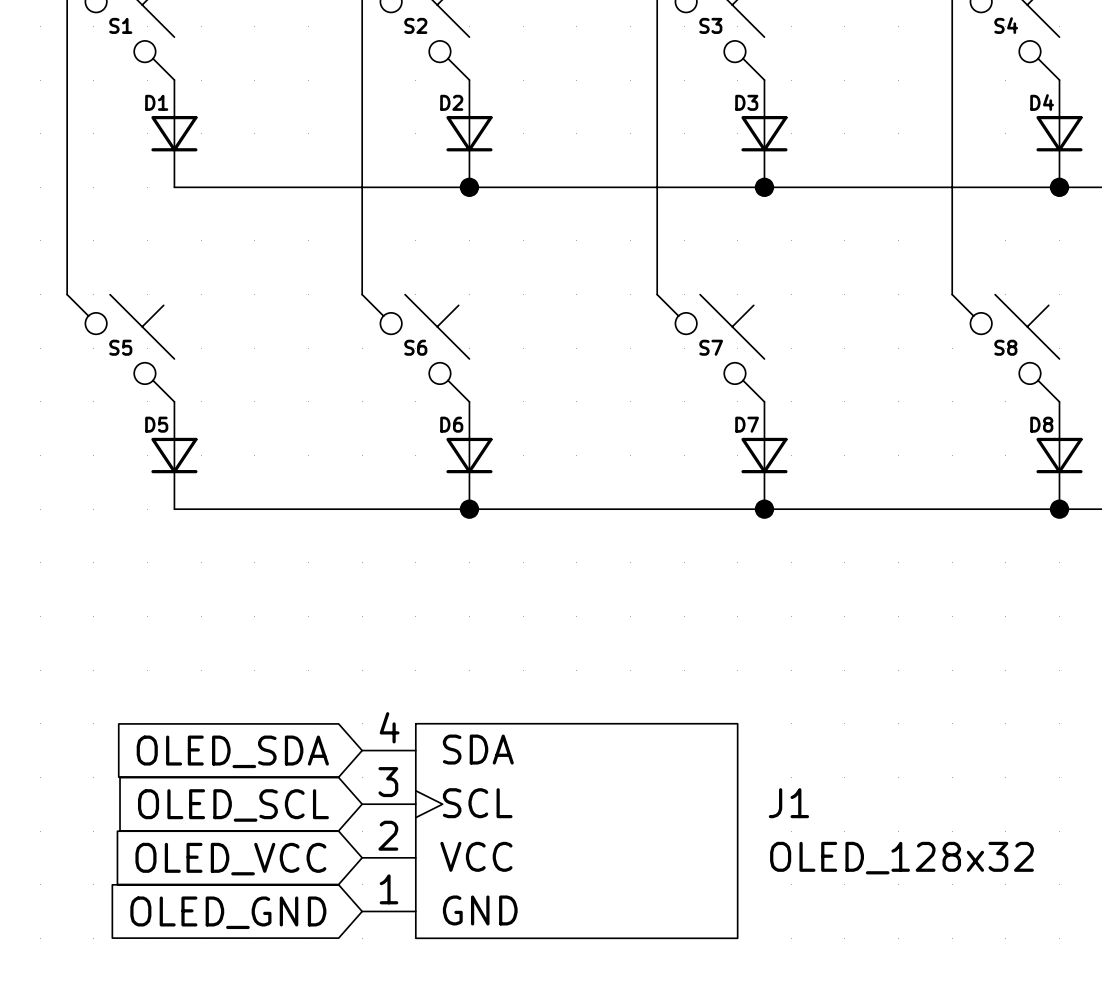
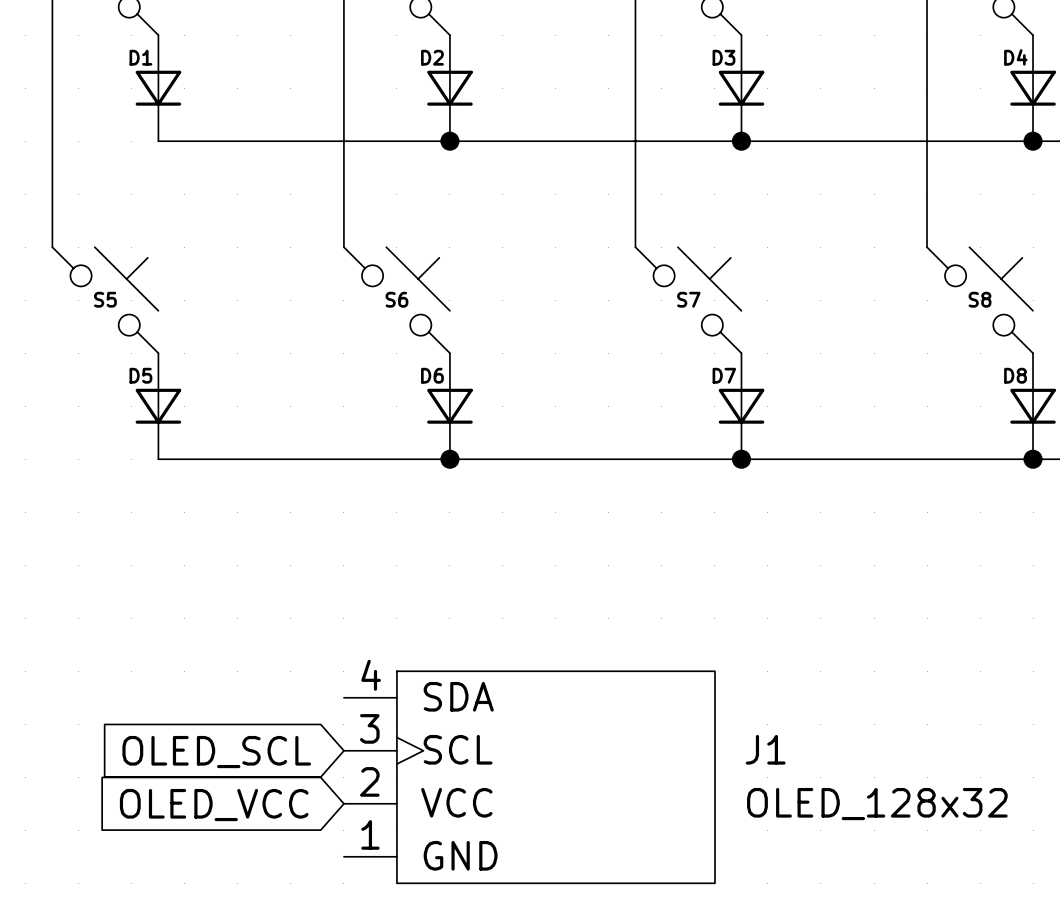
global label: OLED_SDA (232, 751) -> none
global label: OLED_GND (228, 912) -> none

